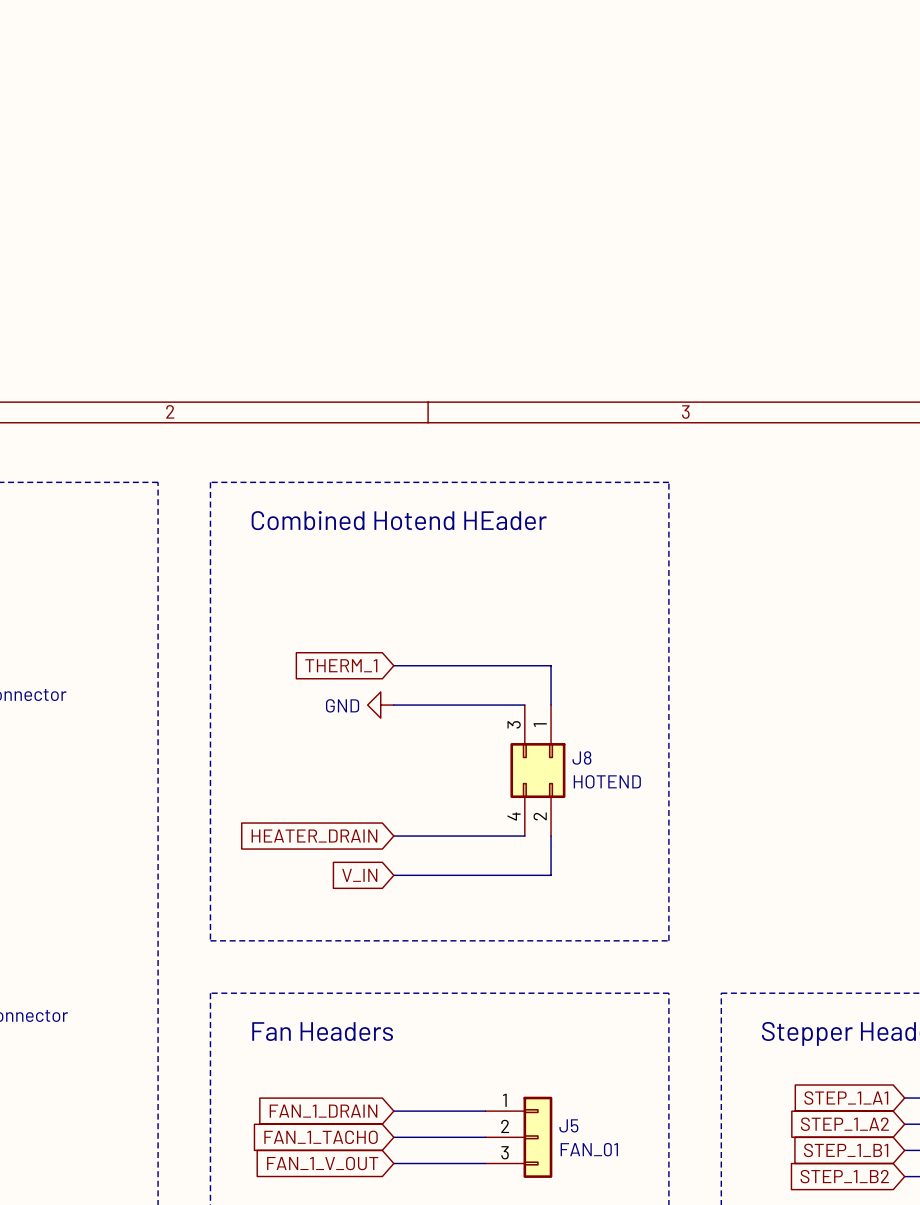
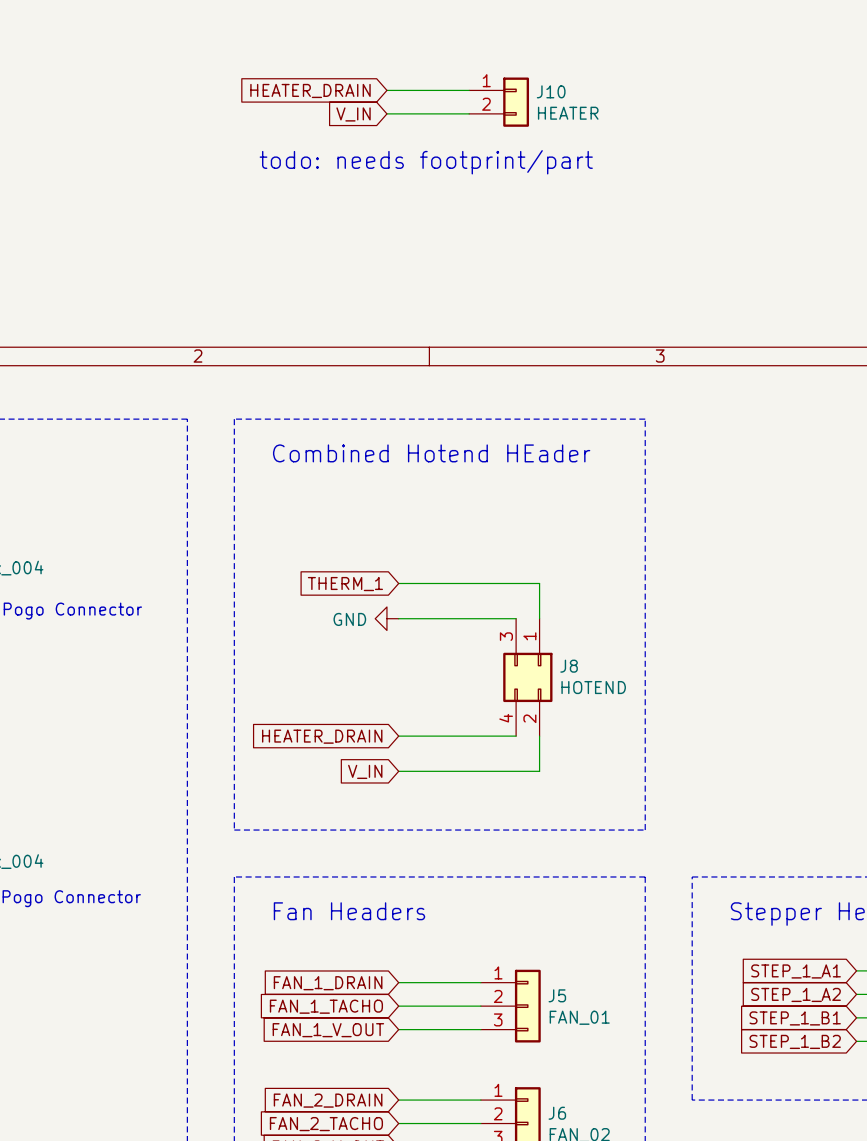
global label: none -> HEATER_DRAIN (310, 90)
wire: none -> (386, 90) (469, 90)
J10: none -> HEATER (499, 102)
global label: none -> V_IN (353, 114)
wire: none -> (386, 113) (469, 113)
text: none -> todo: needs footprint/part (426, 162)

